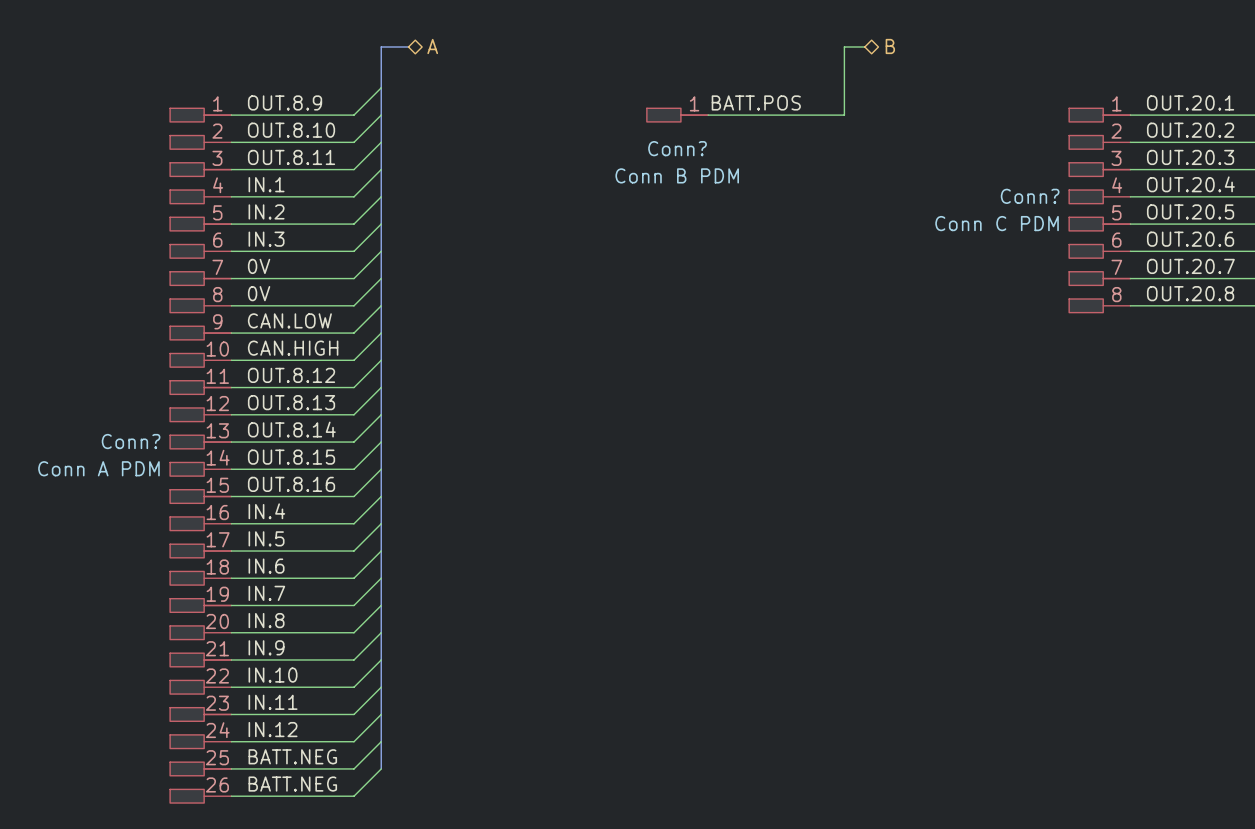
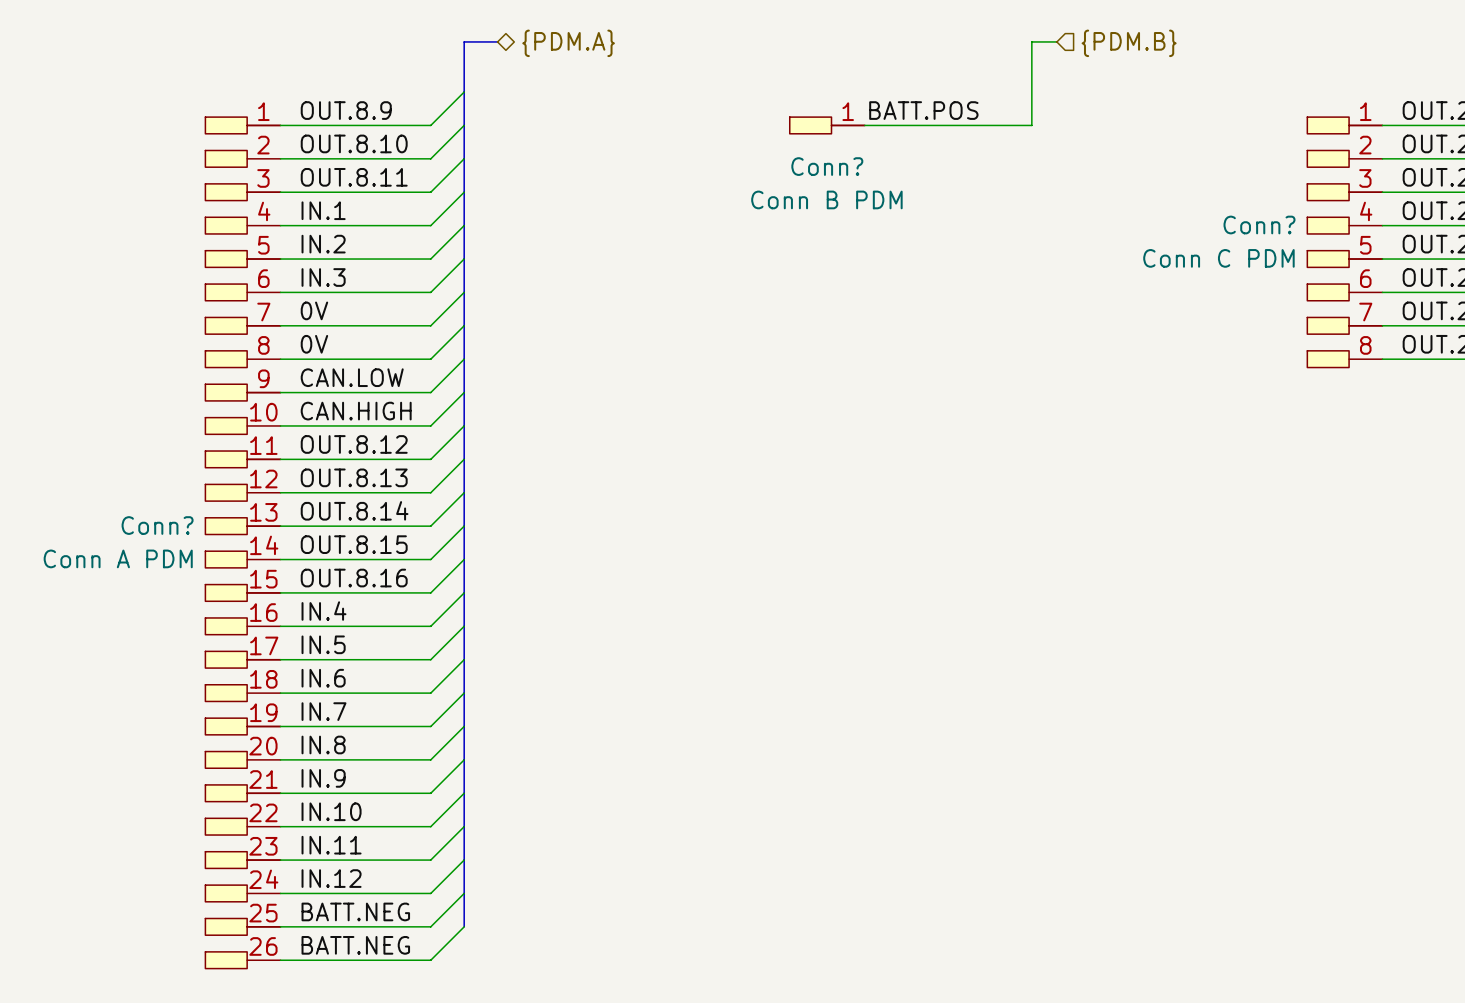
hierarchical label: A (432, 46) -> {PDM.A} (568, 43)
hierarchical label shape: bidirectional (890, 46) -> input (1129, 43)
hierarchical label: B (890, 46) -> {PDM.B} (1129, 43)

